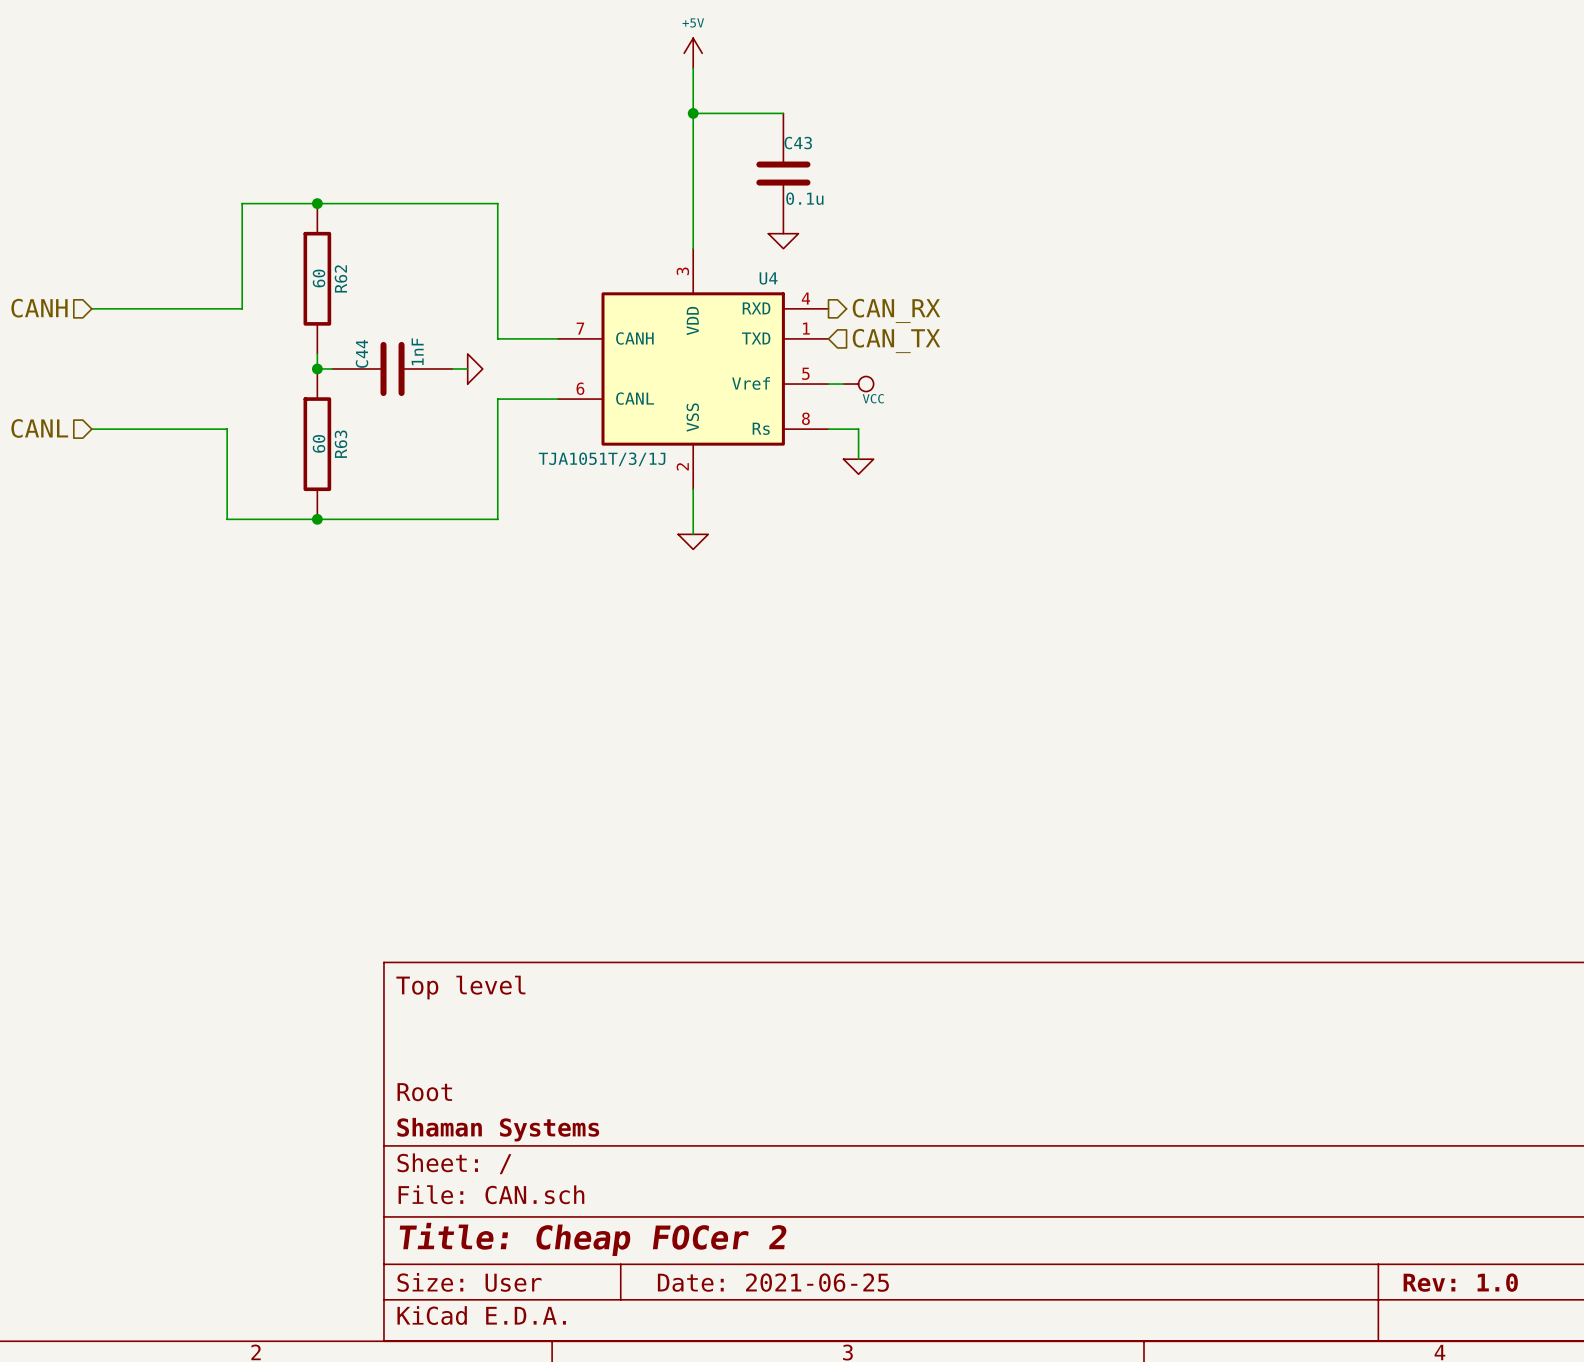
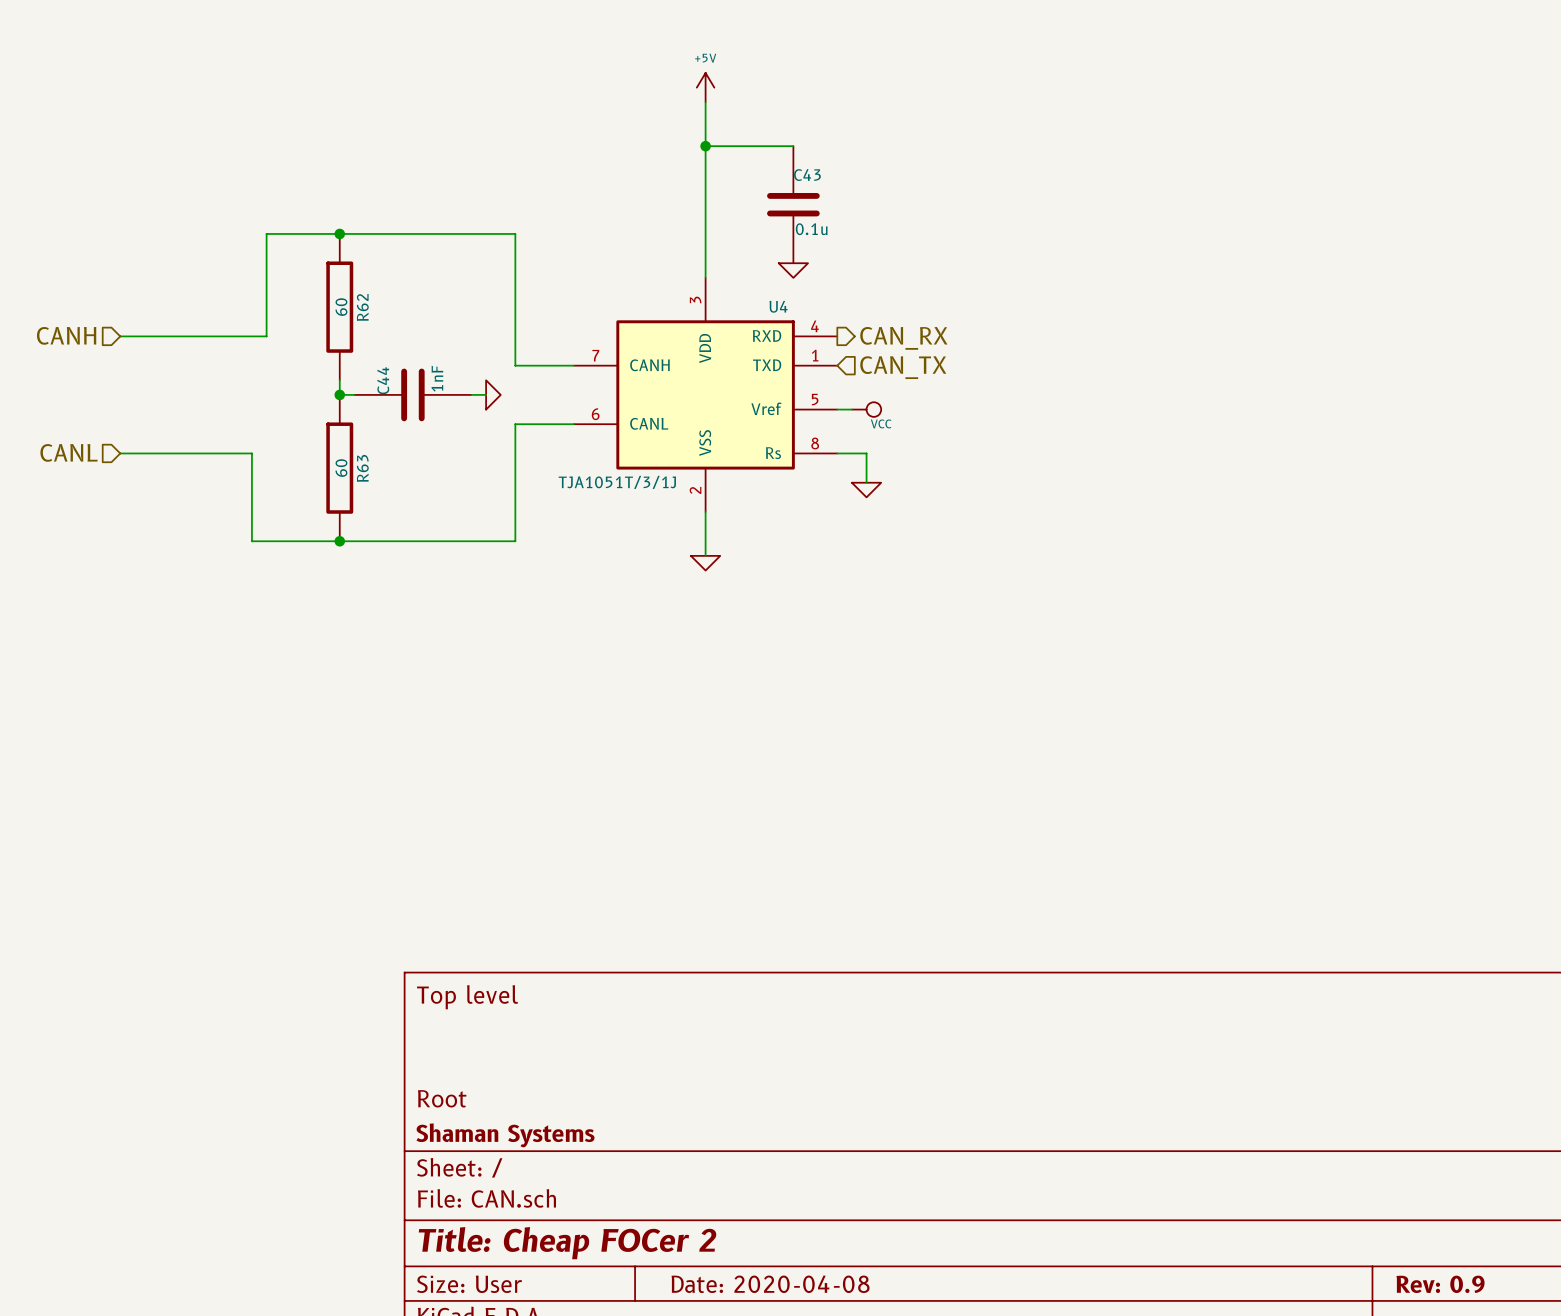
title block: Date: 2021-06-25 (773, 1282) -> Date: 2020-04-08 (770, 1284)
title block: Rev: 1.0 (1460, 1282) -> Rev: 0.9 (1440, 1284)

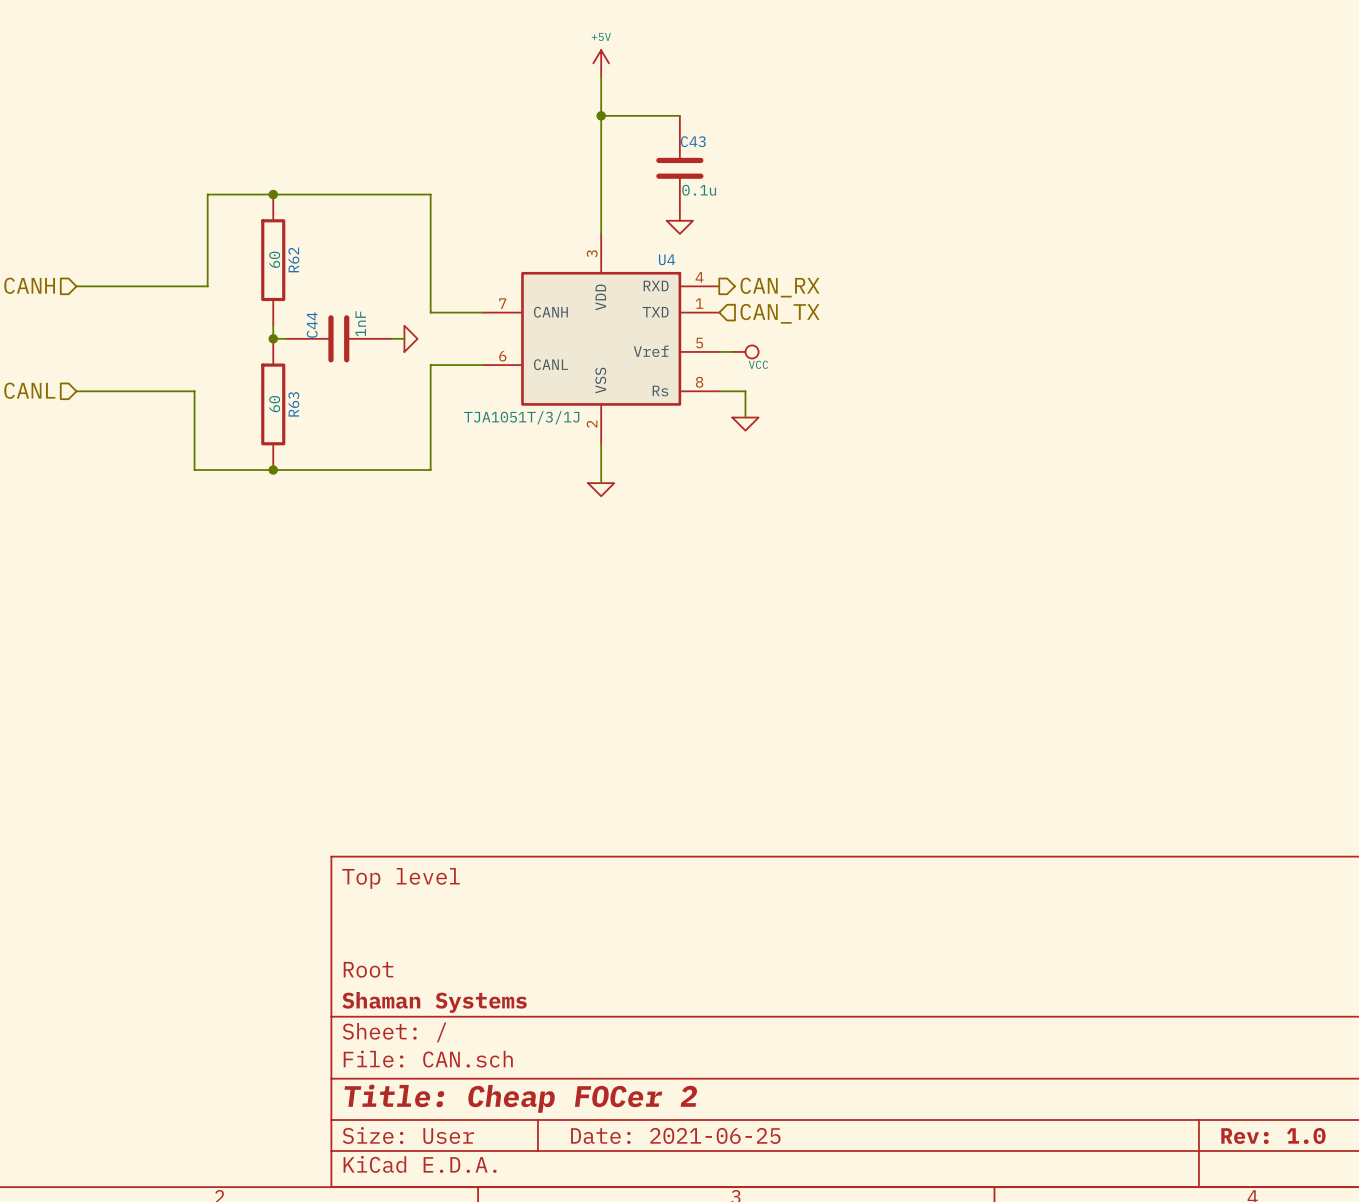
title block: Date: 2020-04-08 (770, 1284) -> Date: 2021-06-25 (675, 1135)
title block: Rev: 0.9 (1440, 1284) -> Rev: 1.0 (1273, 1135)

